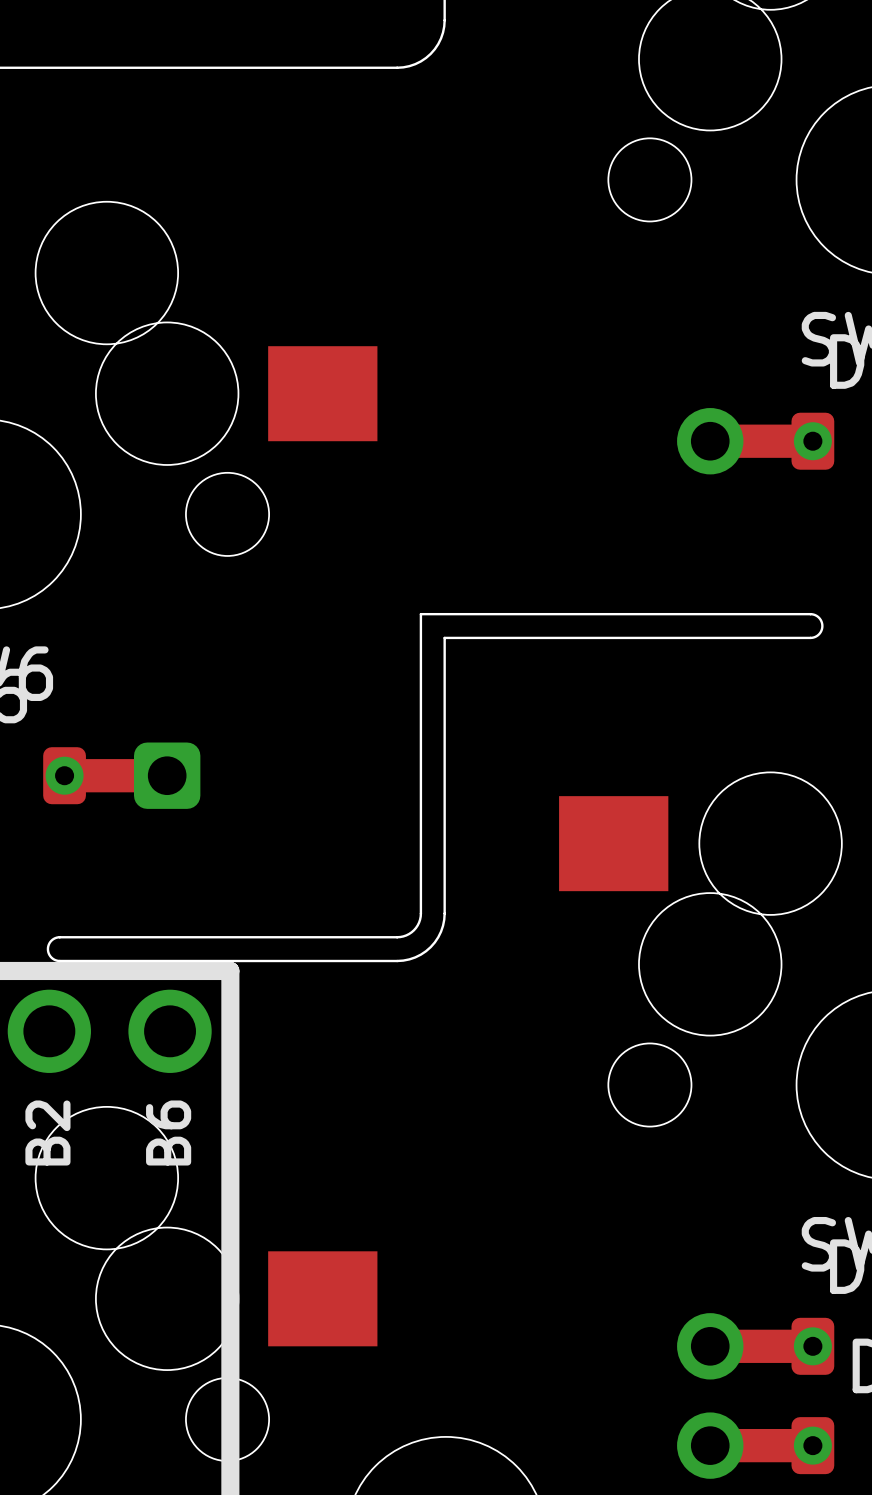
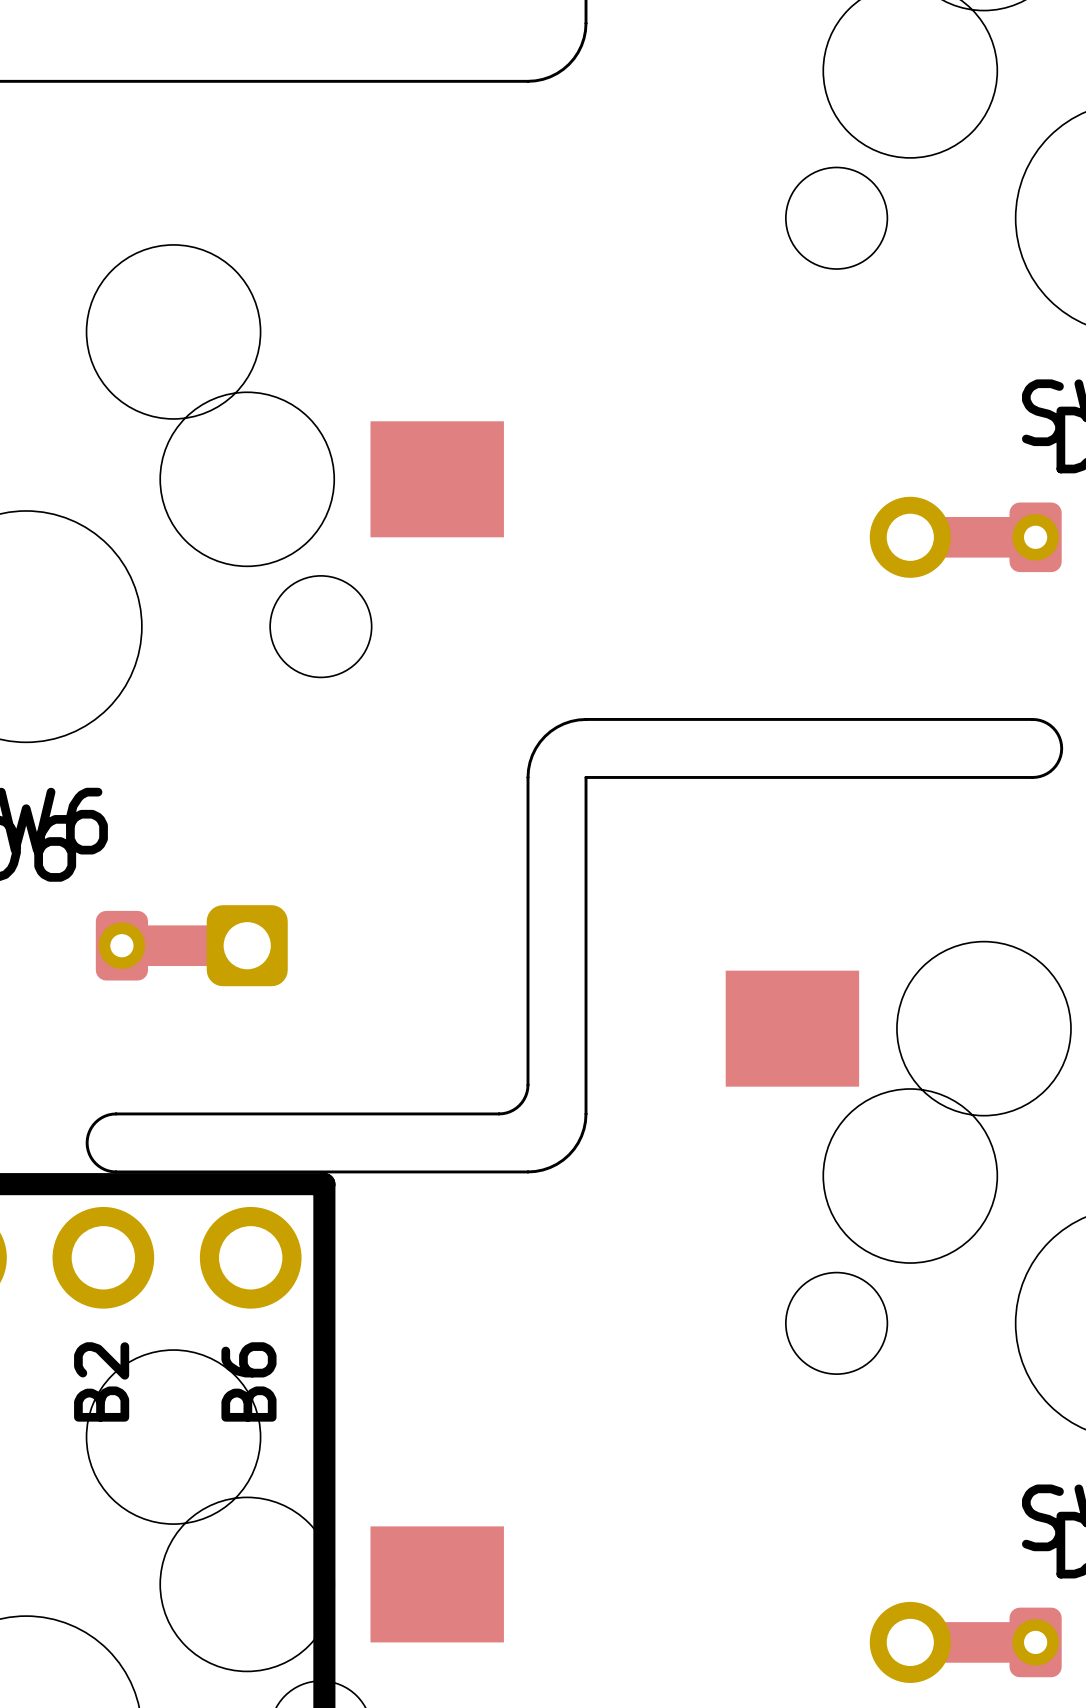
board edge: (810, 637) (818, 634) (822, 626) (818, 617) (810, 614) (420, 614) (420, 913) (419, 922) (413, 930) (406, 935) (397, 937) (58, 937) (51, 940) (47, 949) (51, 957) (59, 961) -> (1032, 777) (1050, 771) (1057, 762) (1061, 752) (1060, 740) (1055, 730) (1047, 723) (1036, 719) (586, 719) (563, 723) (550, 731) (539, 742) (532, 755) (528, 769) (528, 1084) (525, 1096) (519, 1105) (510, 1111) (498, 1113) (112, 1114) (101, 1117) (93, 1125) (87, 1142) (89, 1154) (95, 1163) (105, 1169) (116, 1171)

